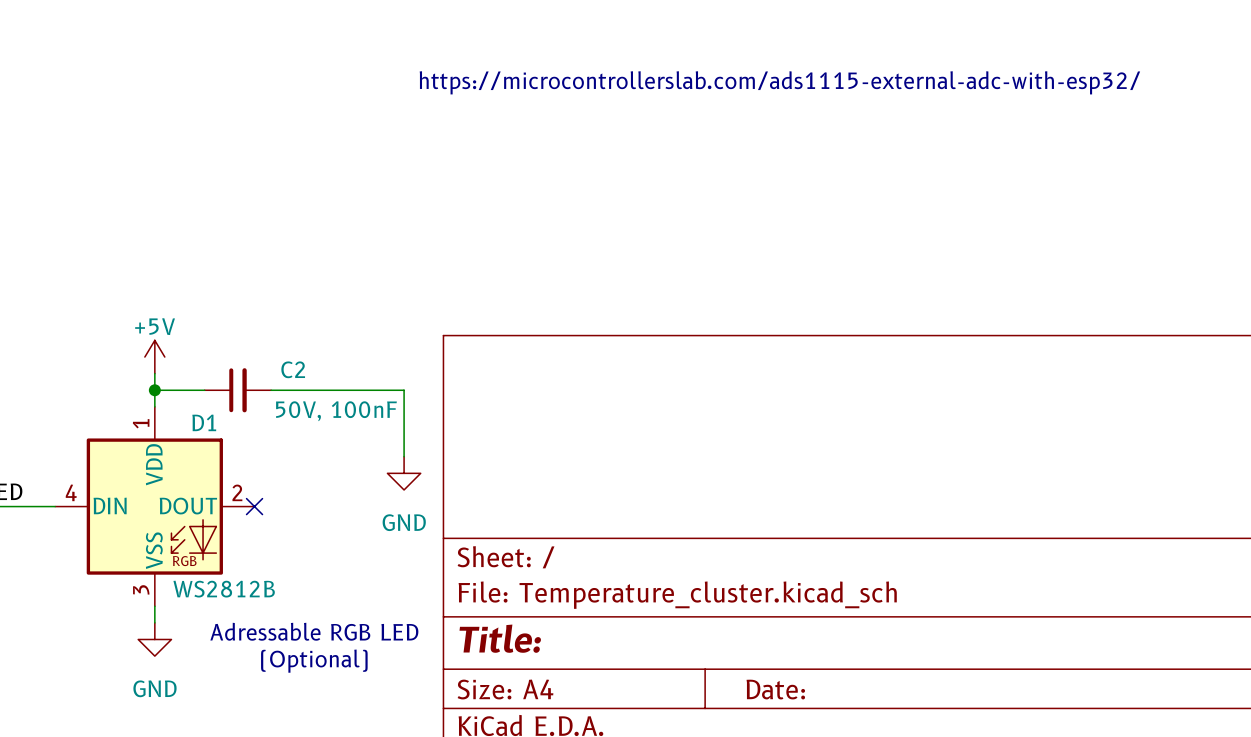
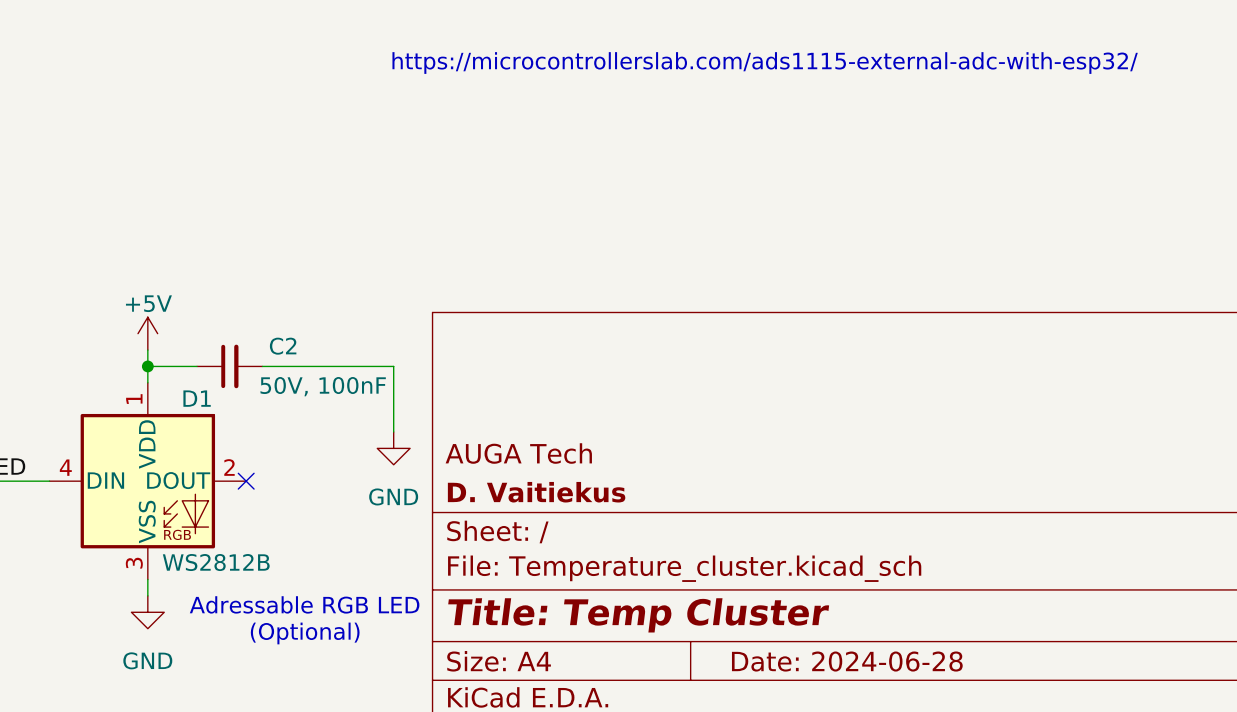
title block: none -> AUGA Tech (518, 453)
title block: none -> D. Vaitiekus (536, 492)
title block: Title: (500, 638) -> Title: Temp Cluster (638, 615)
title block: Date: (775, 689) -> Date: 2024-06-28 (847, 661)

